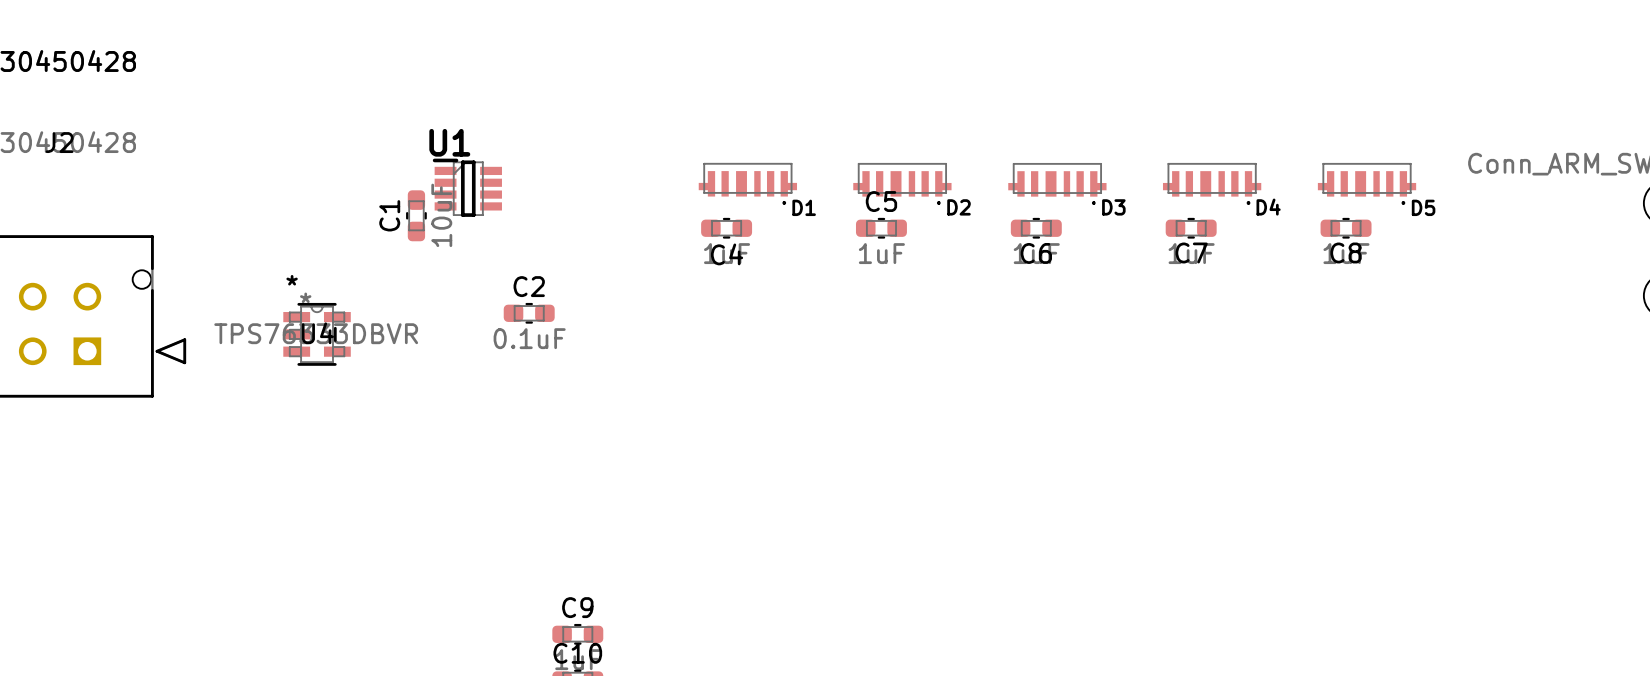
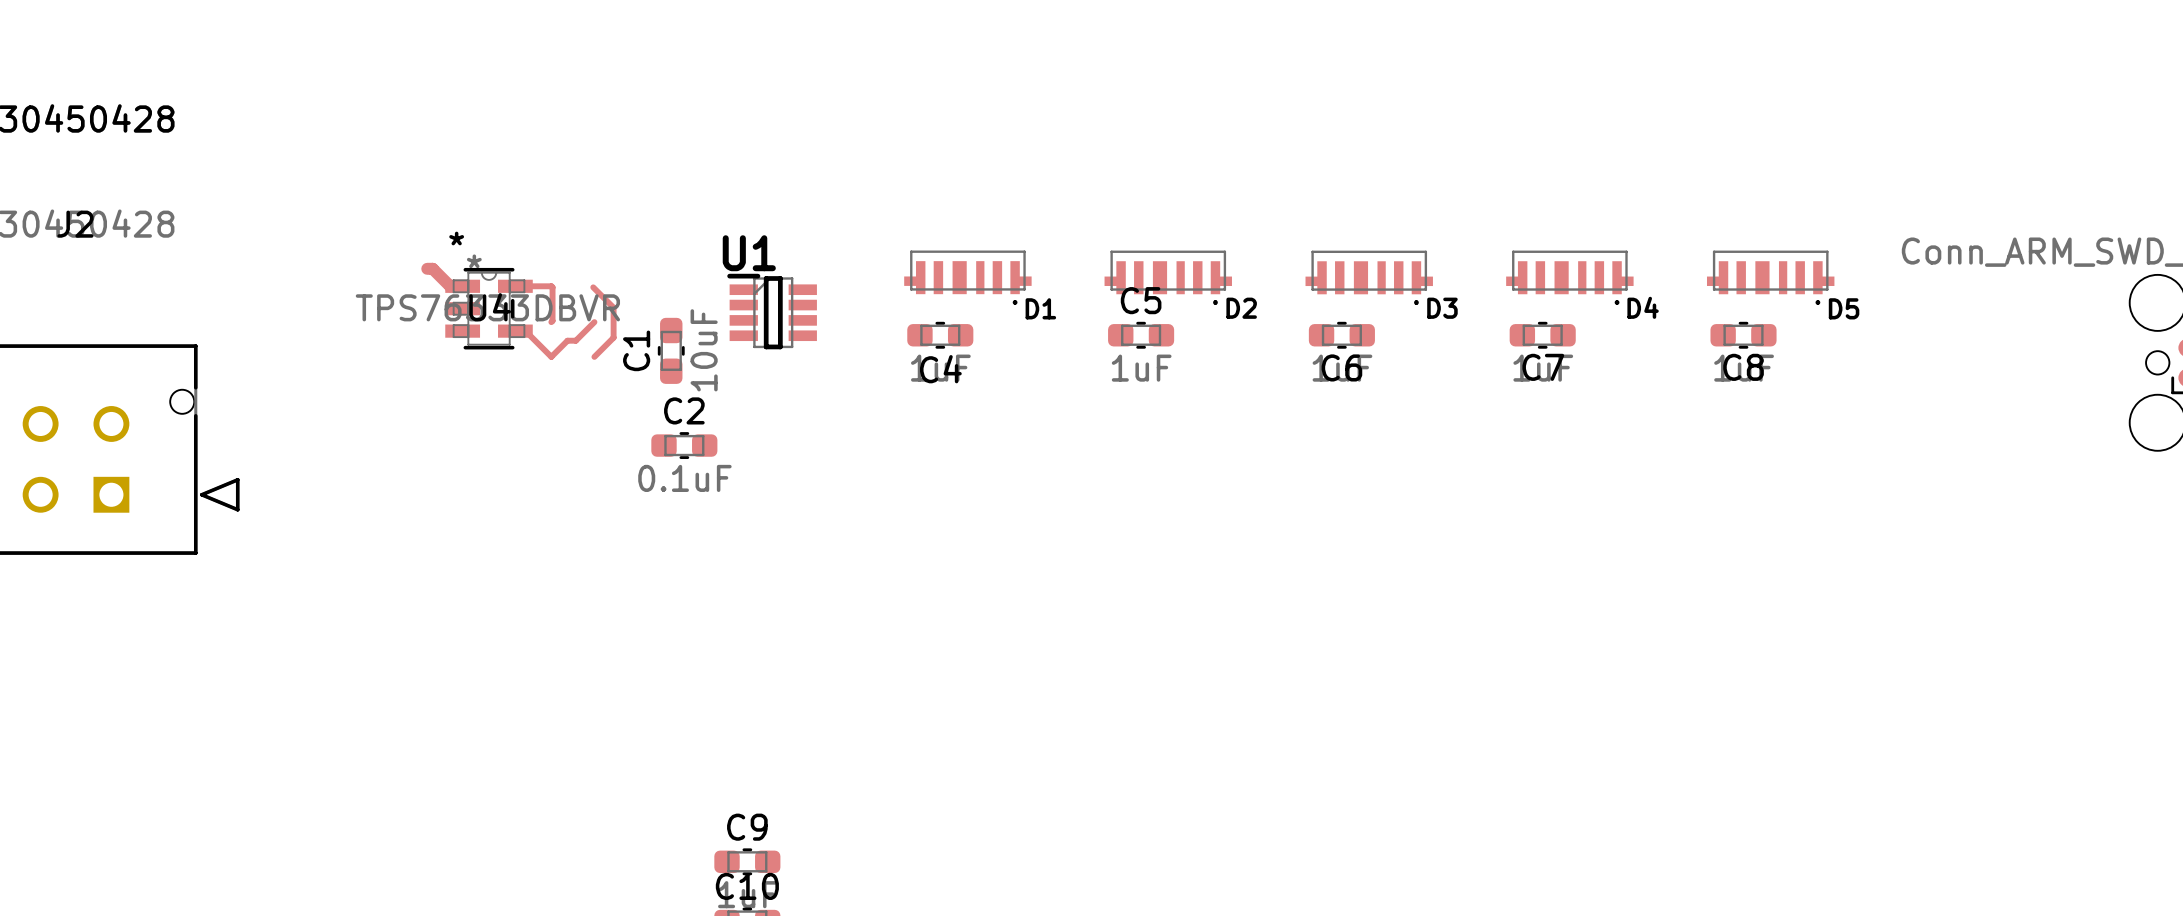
track: none -> (427, 268) (432, 268) (450, 286) (462, 286)
U1 position: (467, 187) -> (772, 311)
track: none -> (515, 286) (551, 286) (551, 322)
track: none -> (593, 287) (613, 307) (613, 337) (594, 356)
C1 position: (416, 215) -> (671, 350)
track: none -> (594, 322) (575, 340) (567, 340) (551, 356) (525, 331) (515, 331)
U4 position: (317, 334) -> (489, 308)

